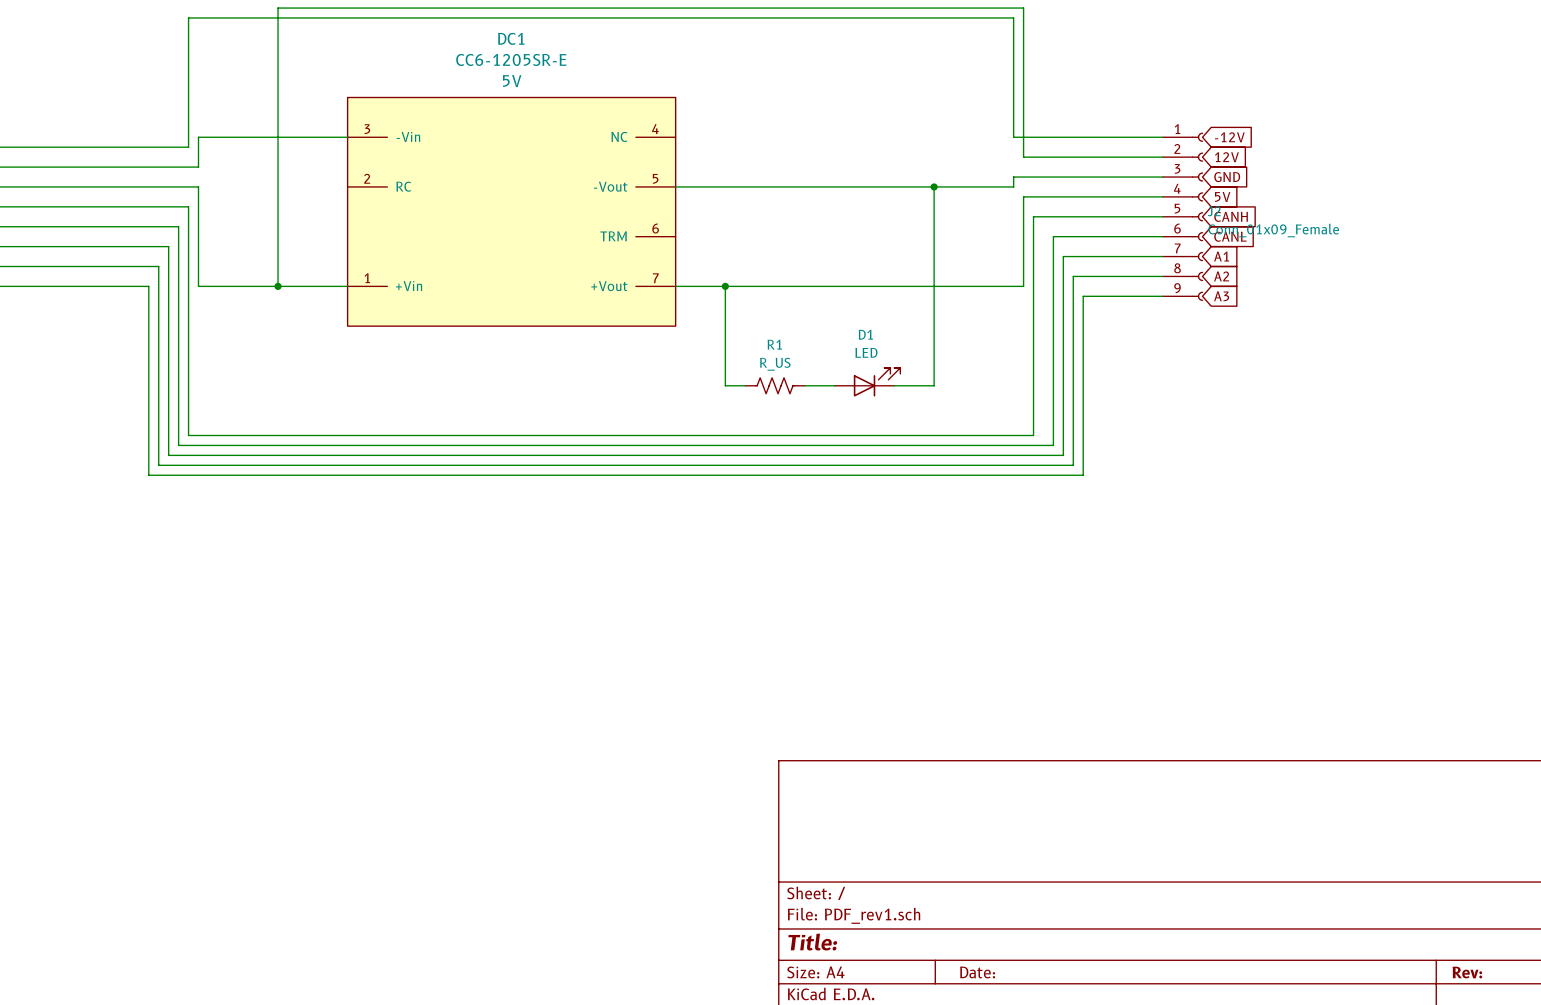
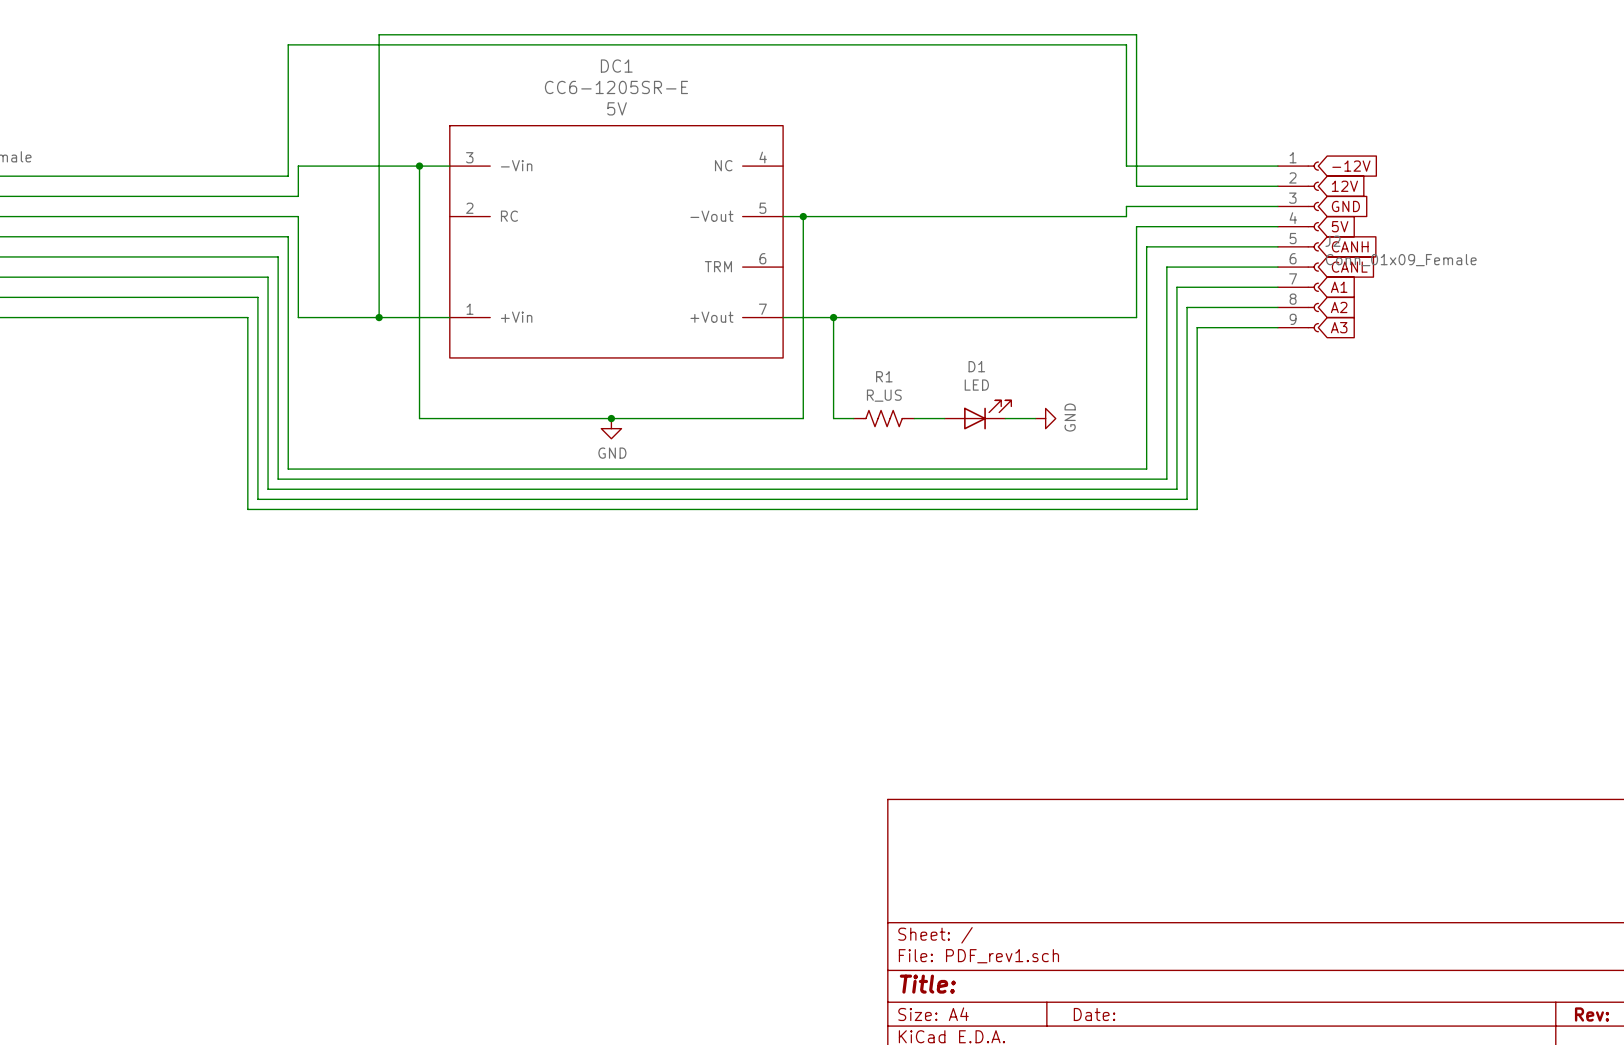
wire: none -> (419, 166) (419, 418) (803, 418) (803, 216)
junction: none -> (419, 166)
junction: none -> (803, 216)
wire: (934, 186) (934, 385) (924, 385) -> none
junction: (934, 186) -> none
junction: none -> (611, 418)
power symbol: none -> GND (1045, 418)
power symbol: none -> GND (611, 428)

